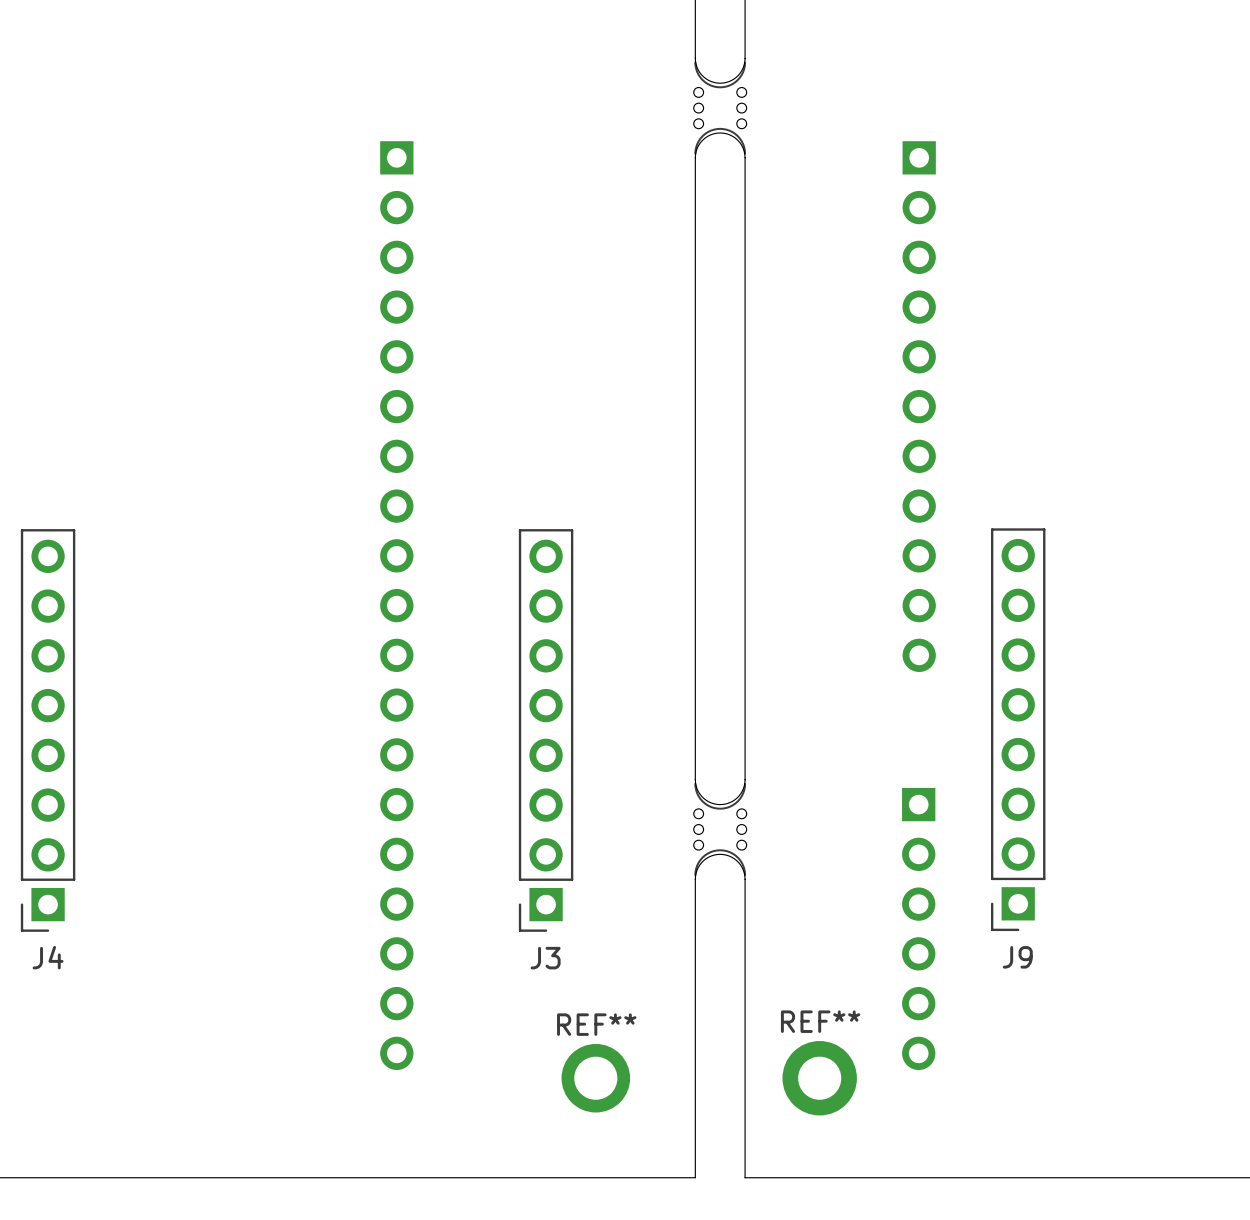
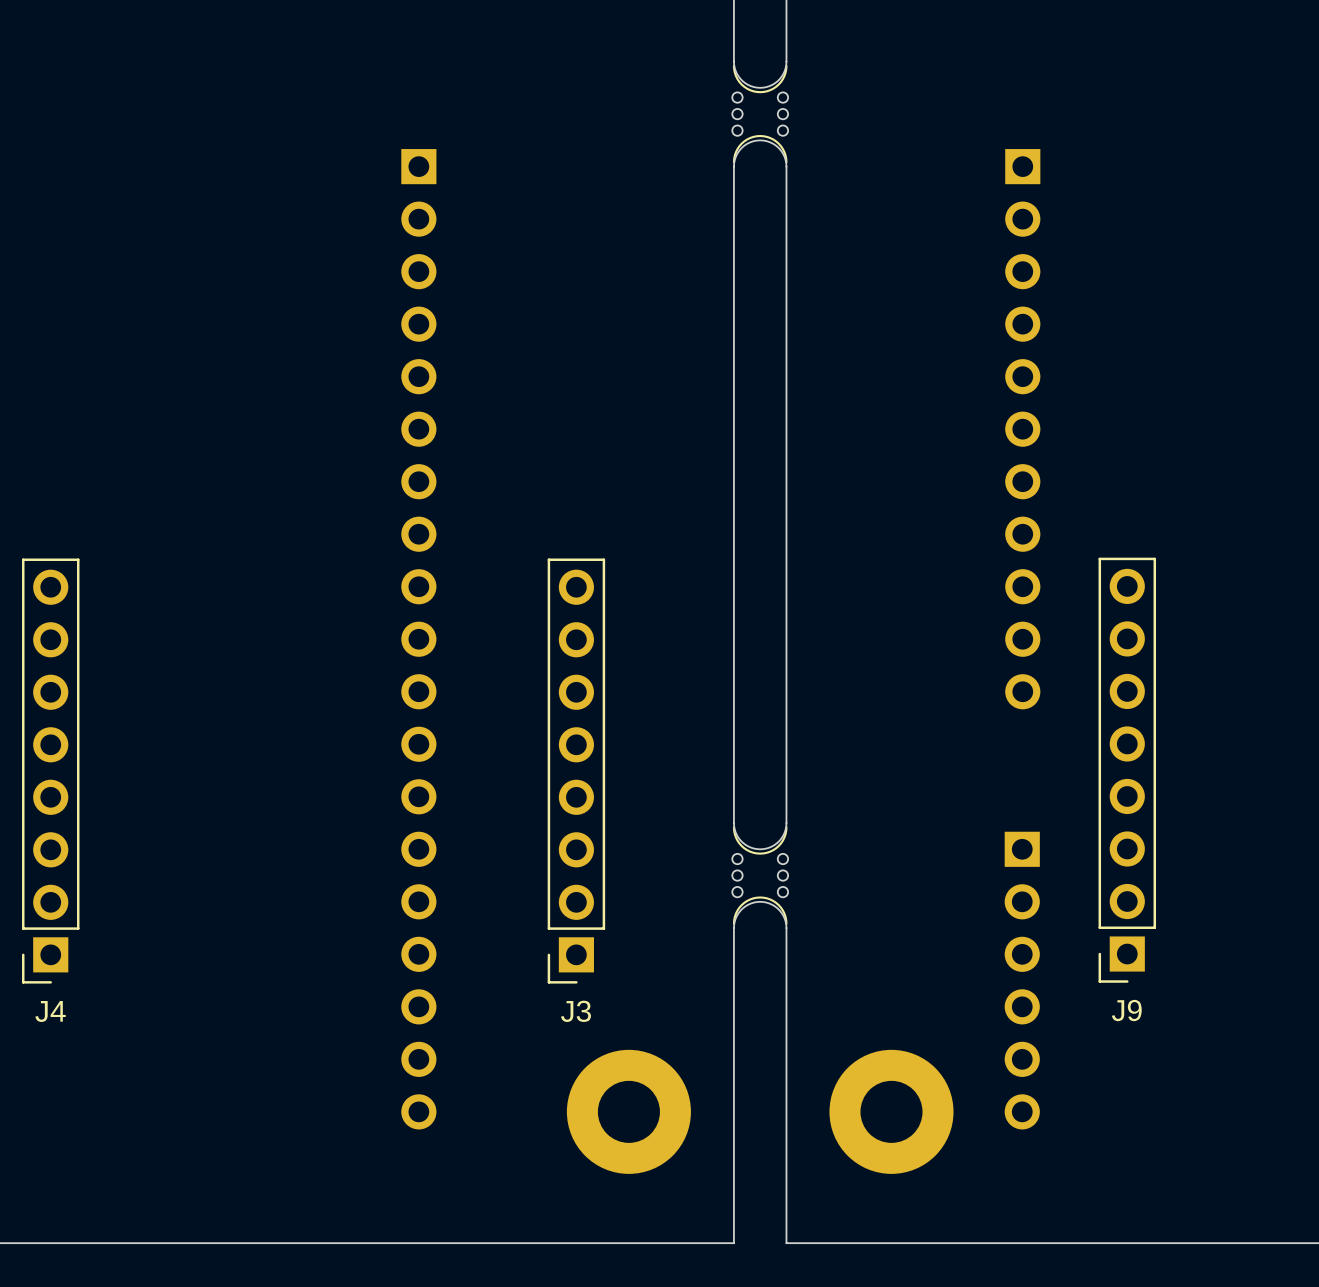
part position: (919, 406) -> (1022, 429)
J9 position: (1018, 729) -> (1127, 770)
part position: (918, 928) -> (1022, 980)
part: none -> (628, 1111)
part: none -> (891, 1111)
REF**: (595, 1078) -> none
REF**: (819, 1078) -> none

